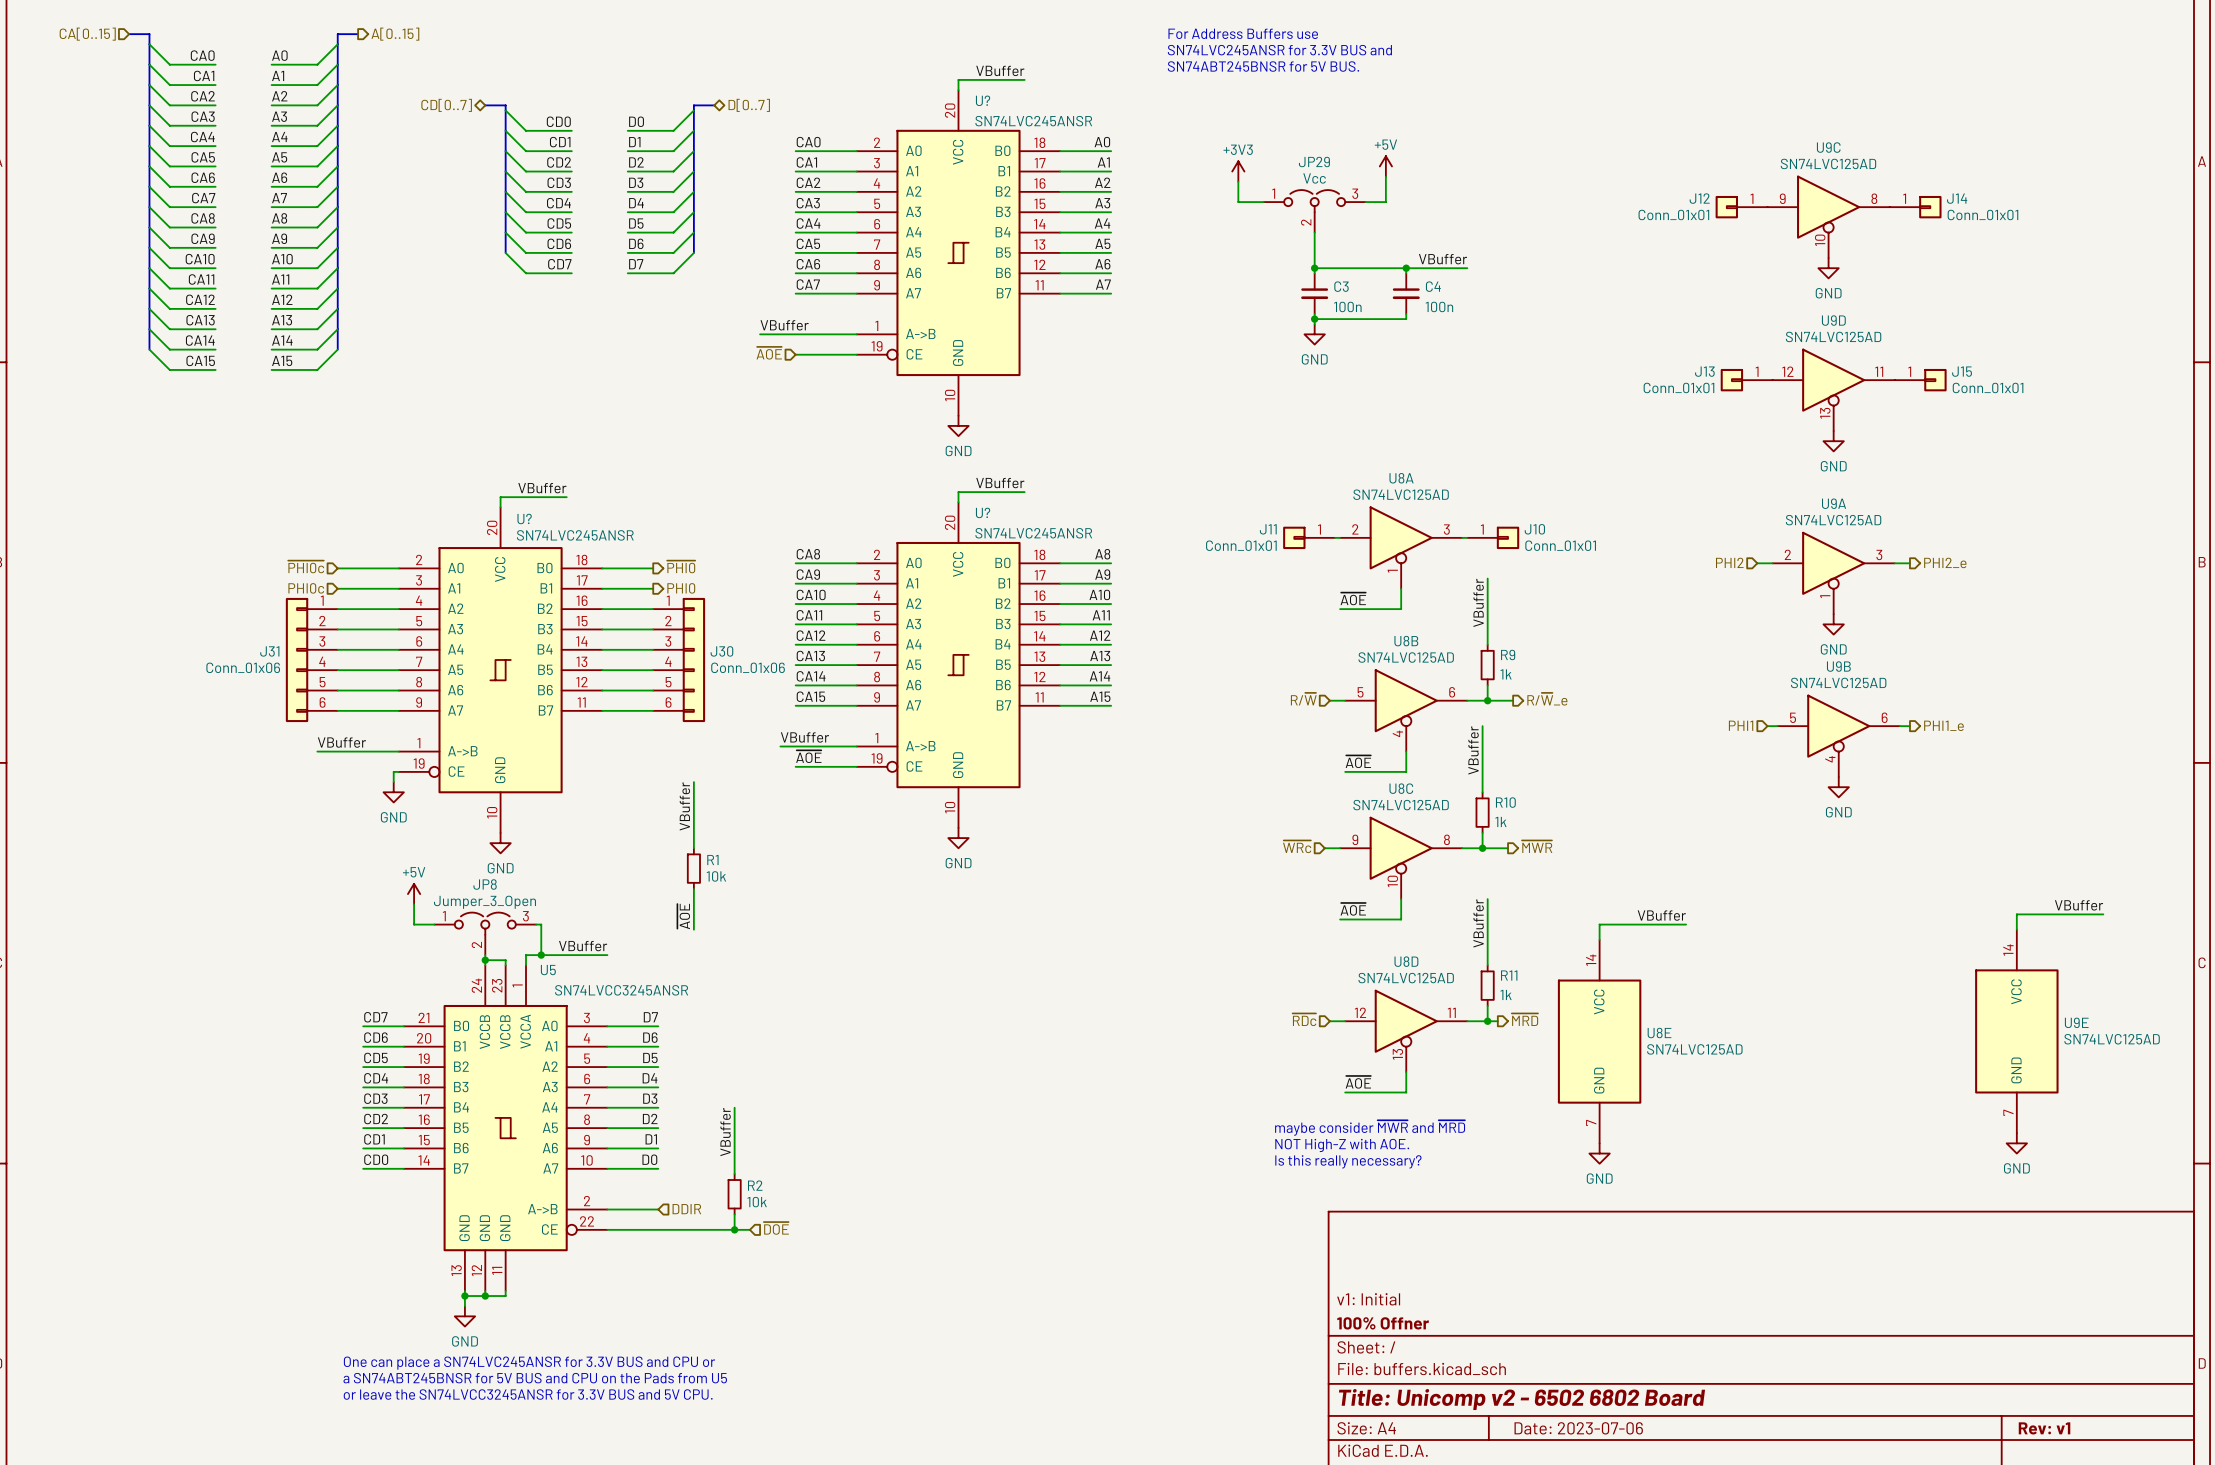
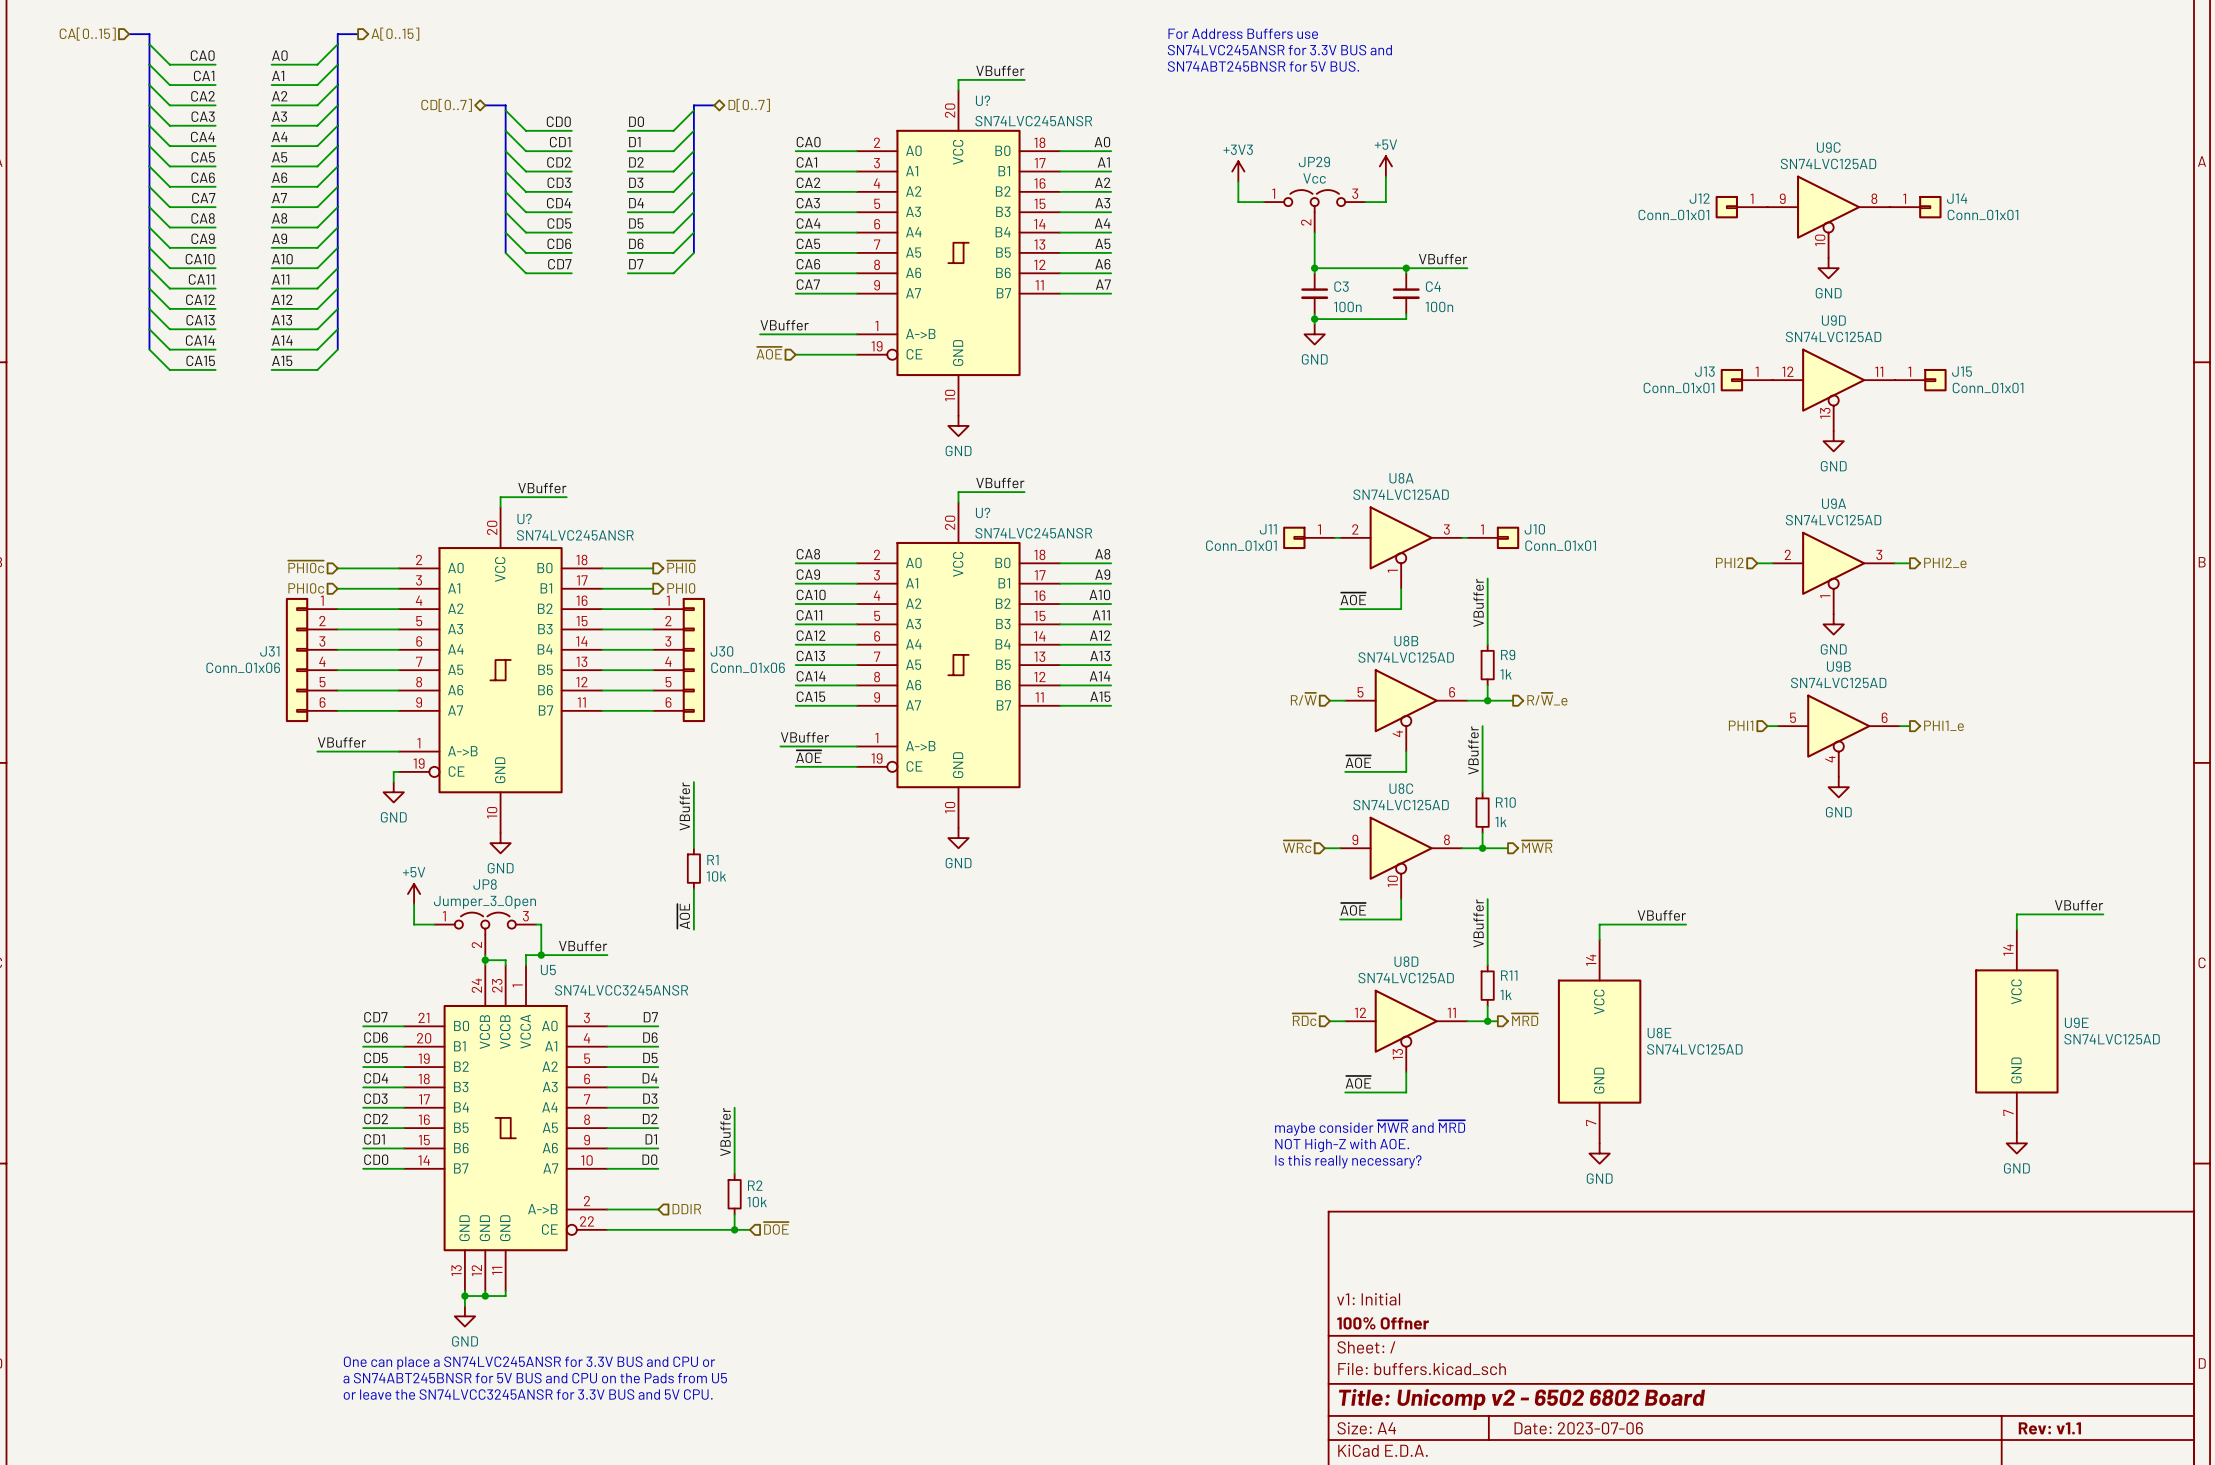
title block: Rev: v1 (2044, 1428) -> Rev: v1.1 (2049, 1428)

